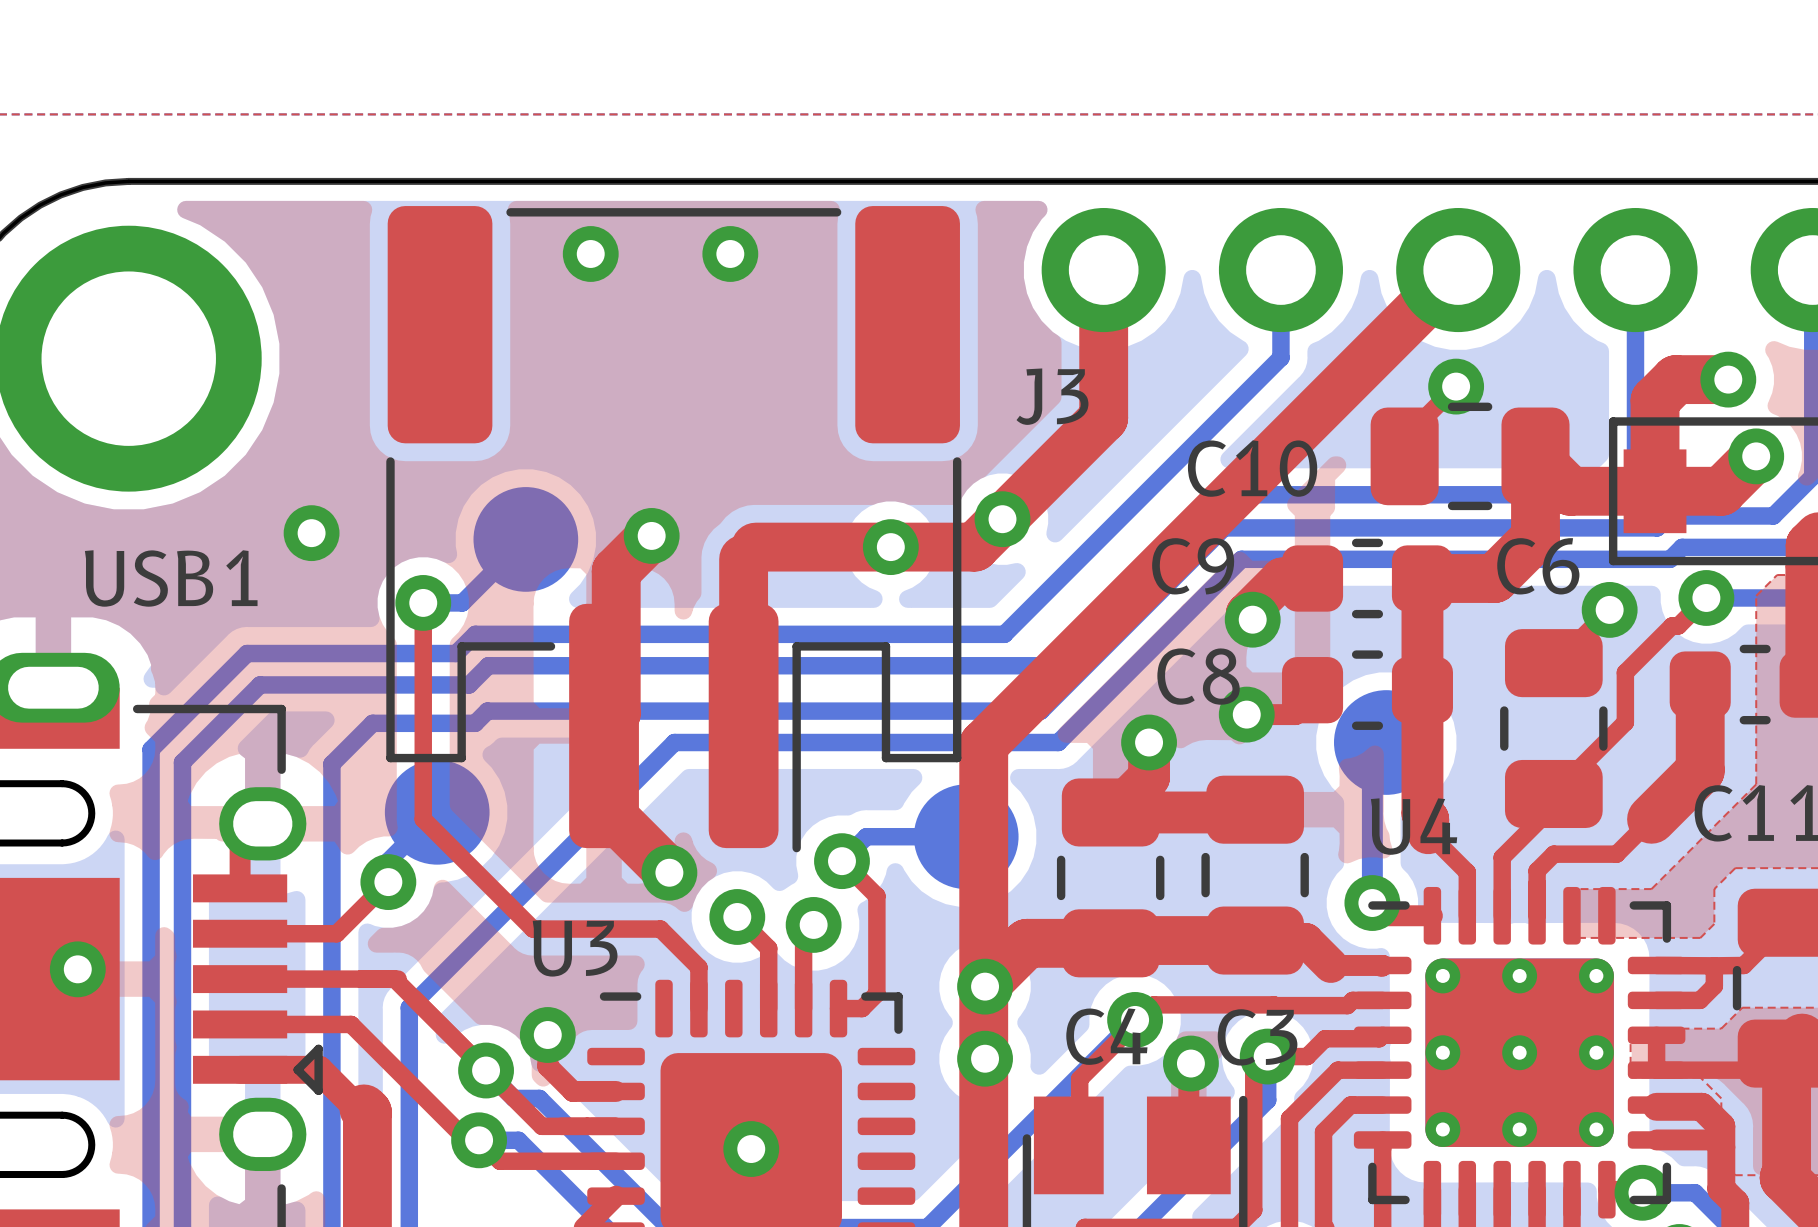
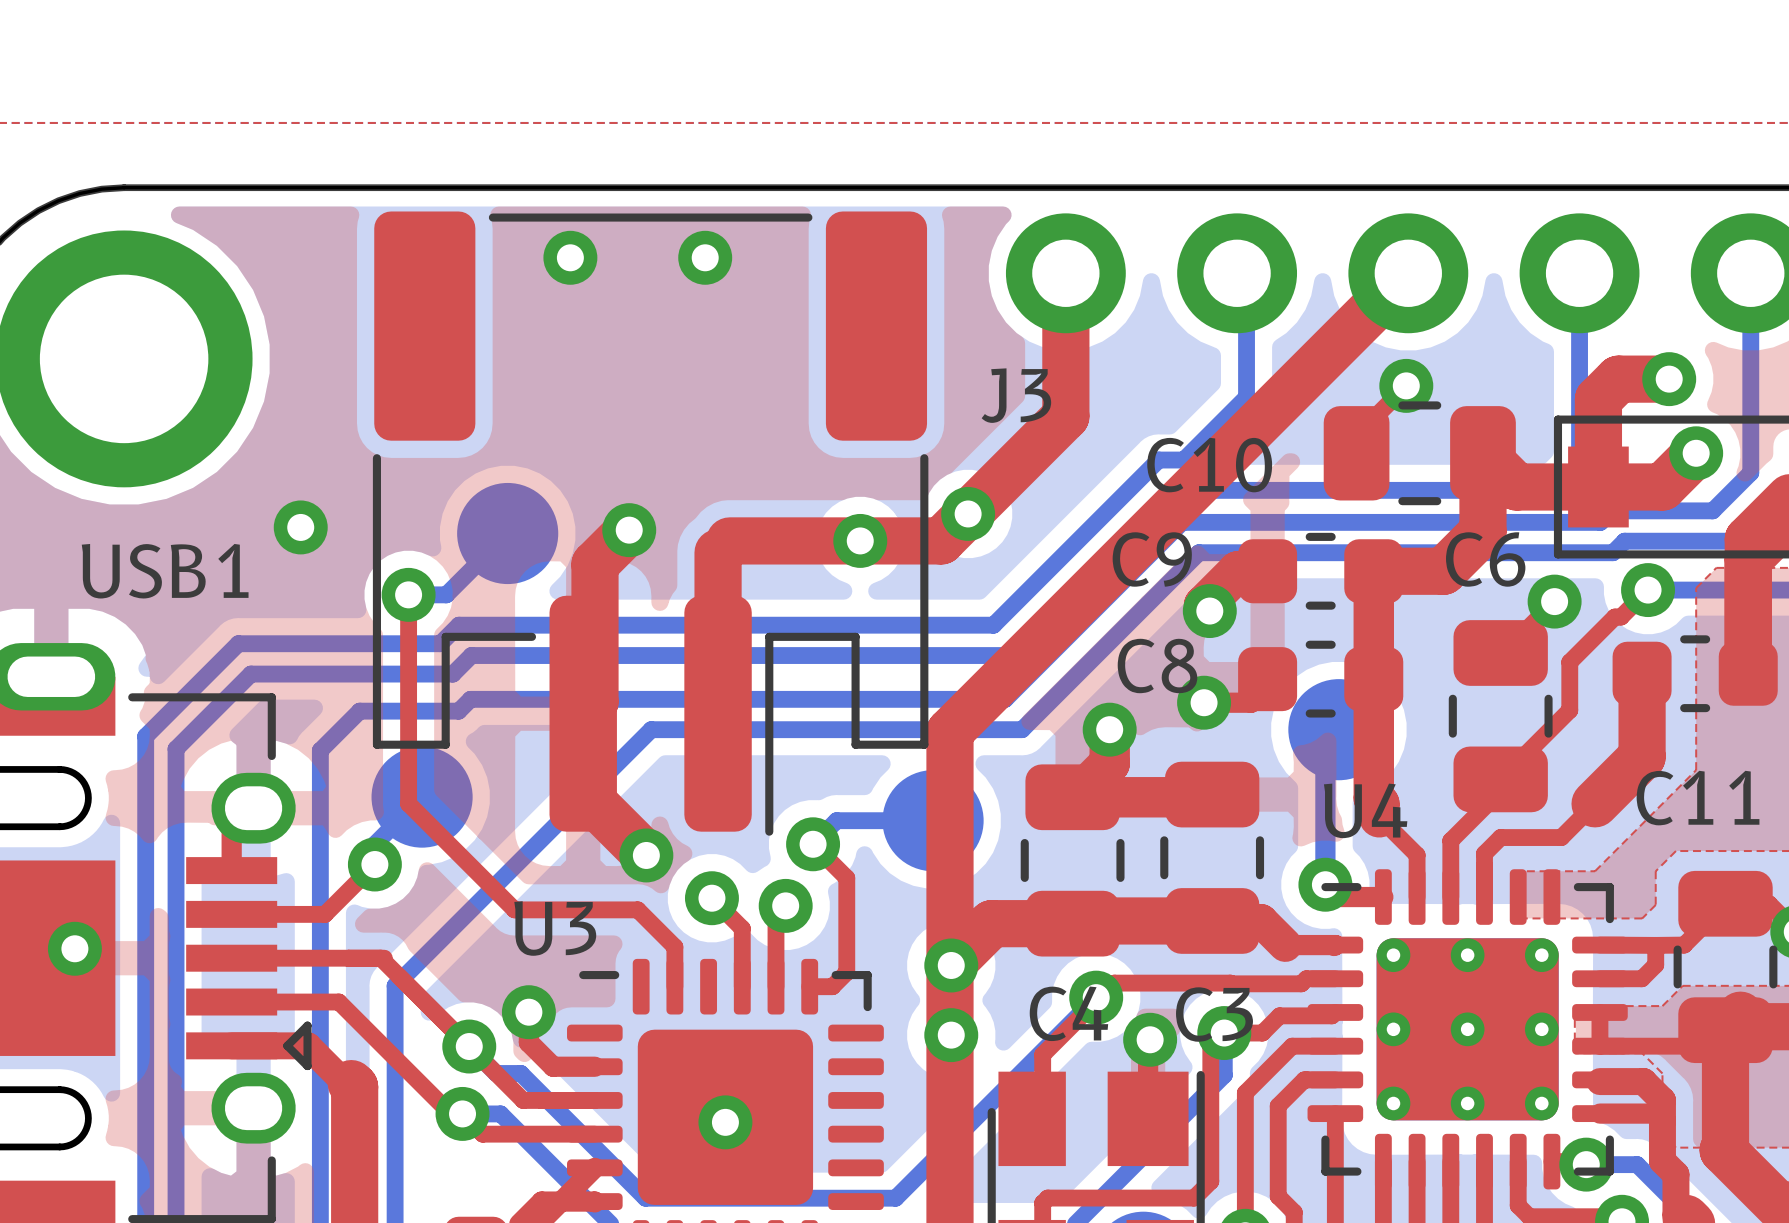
bottom track: (1280, 270) (1280, 357) (1004, 634) -> (1237, 273) (1246, 273) (1246, 397) (1183, 460) (1158, 460) (993, 625) (969, 625)

